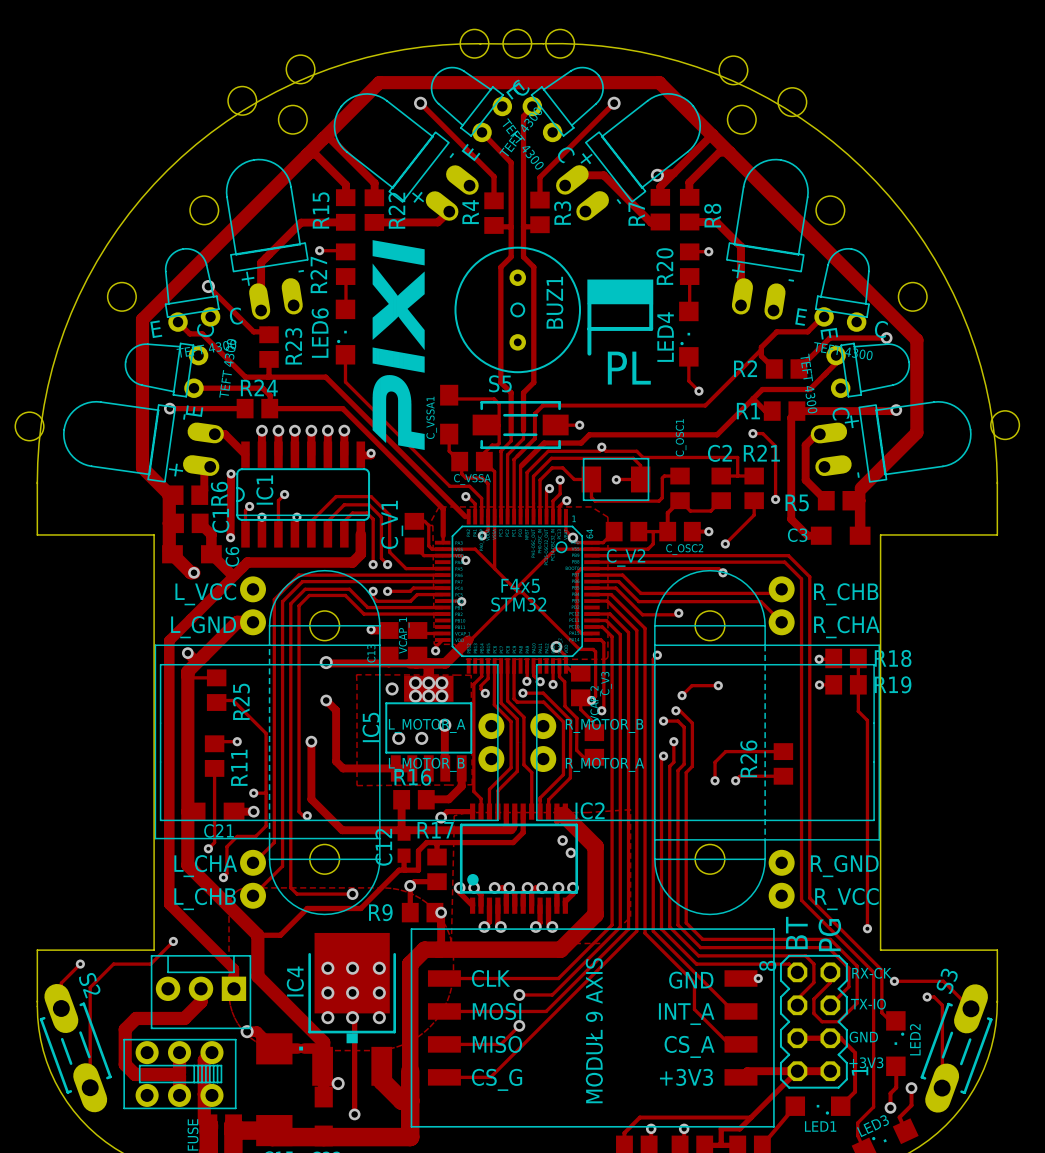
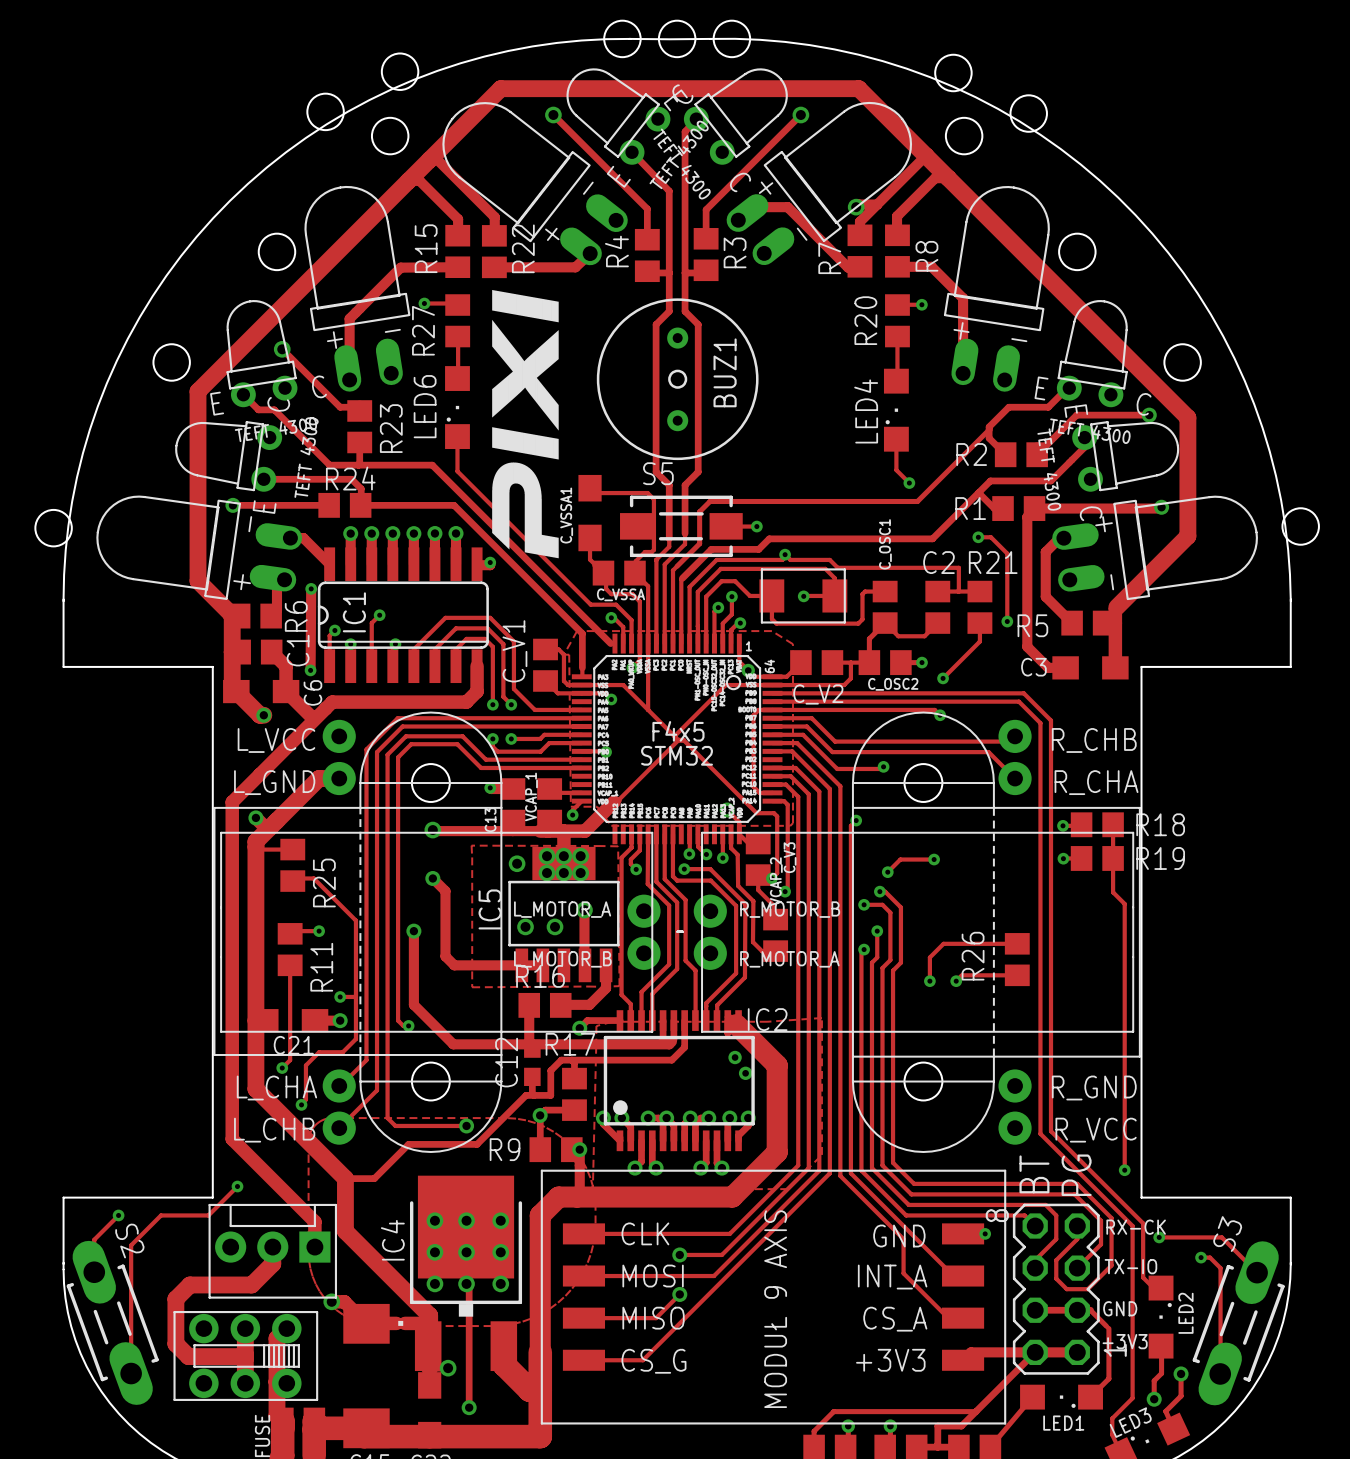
drawing: [587, 279, 654, 305] -> none
line: (589, 304) (589, 353) -> none
line: (651, 304) (651, 328) (589, 328) -> none
text: PL (629, 368) -> none

